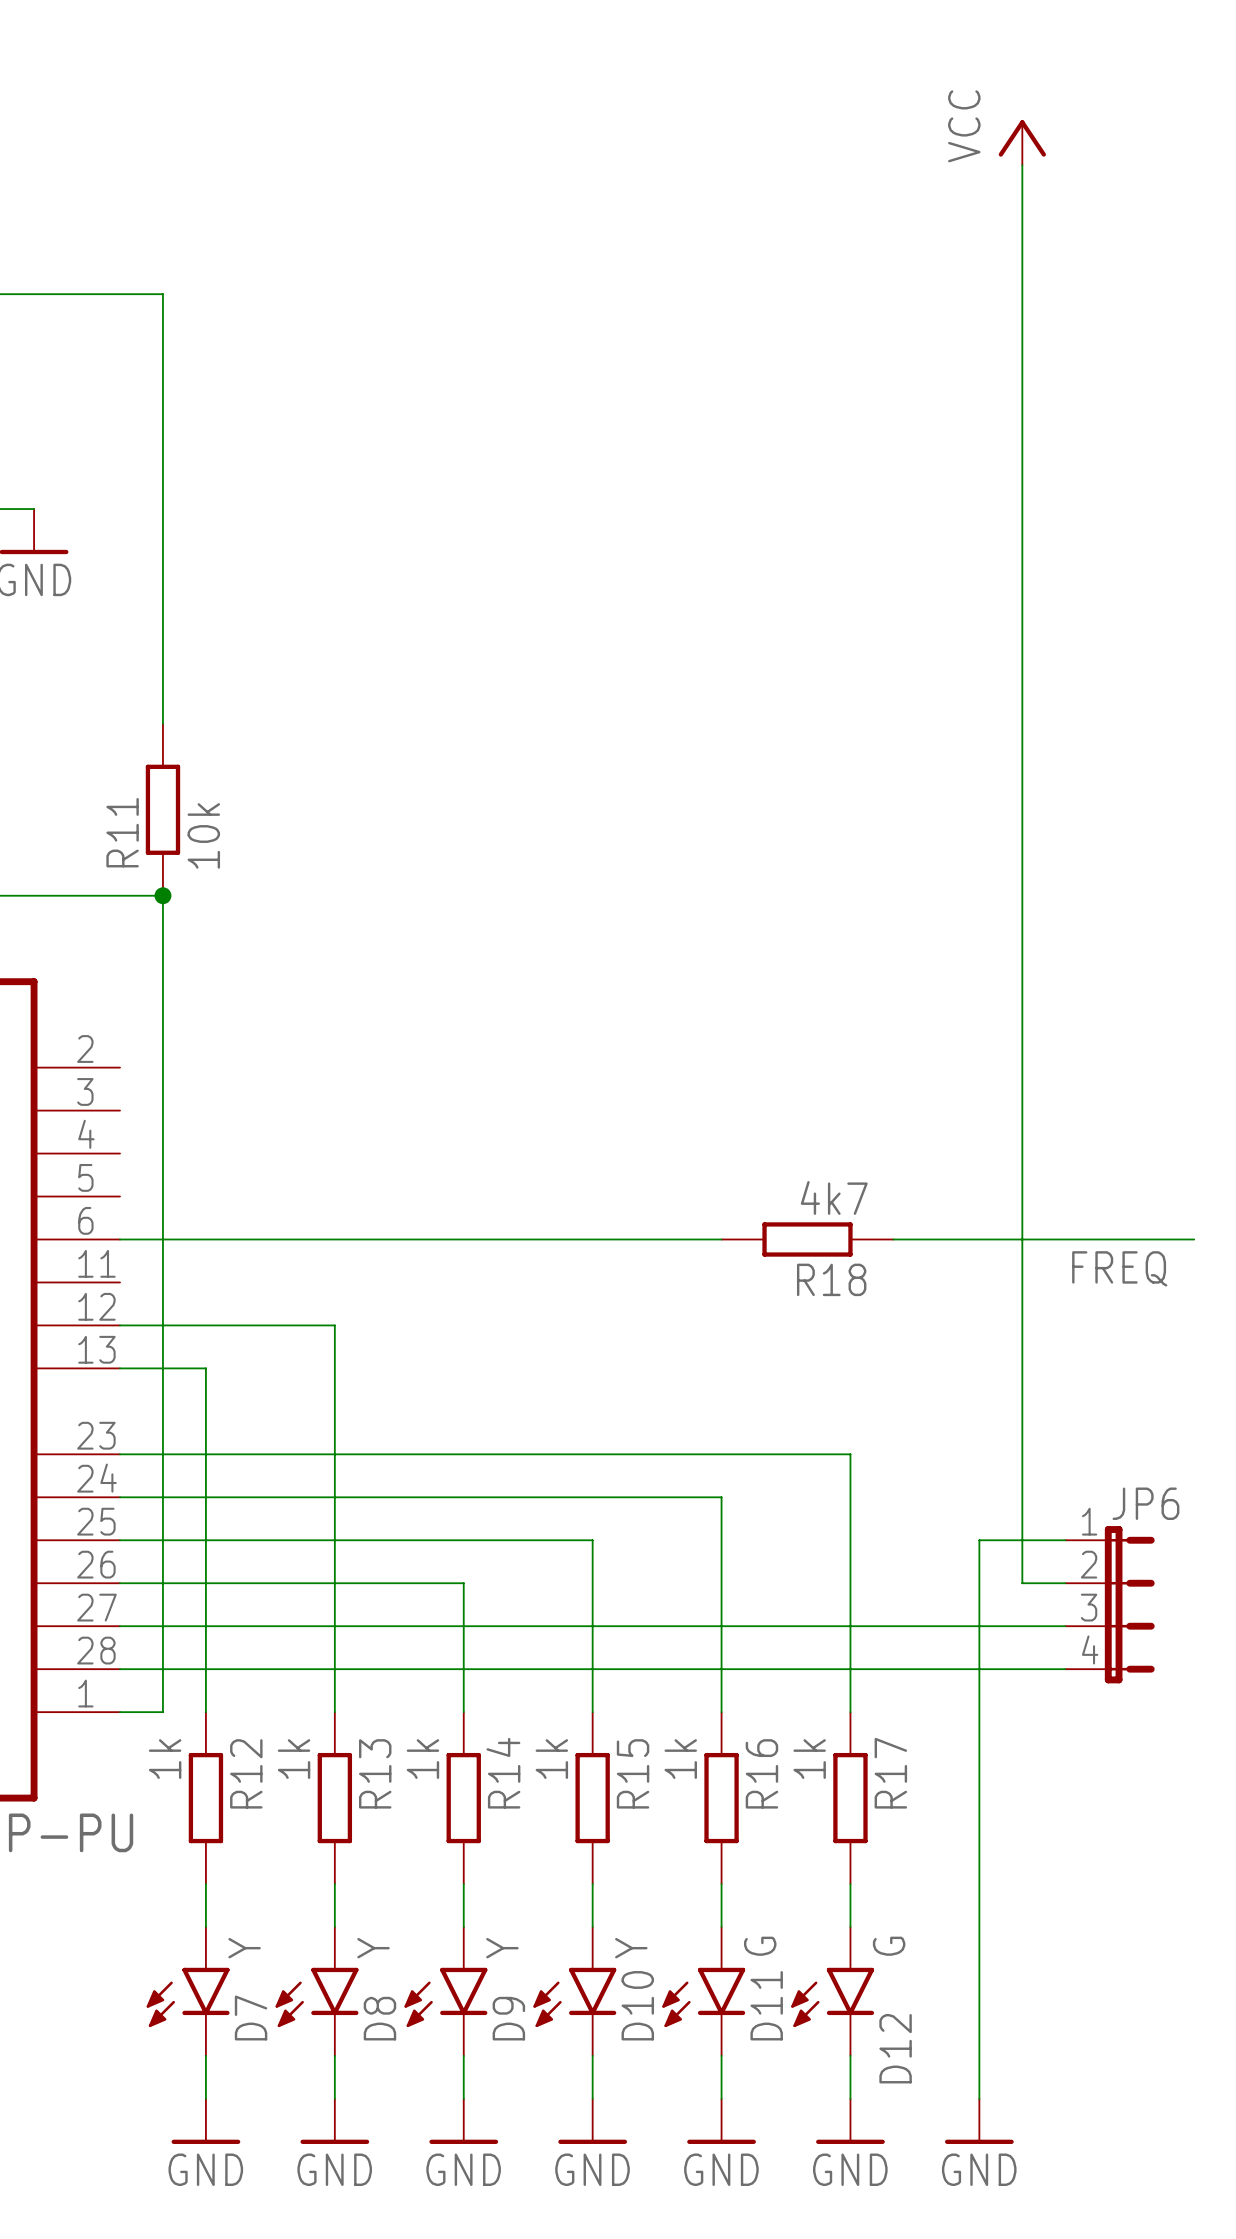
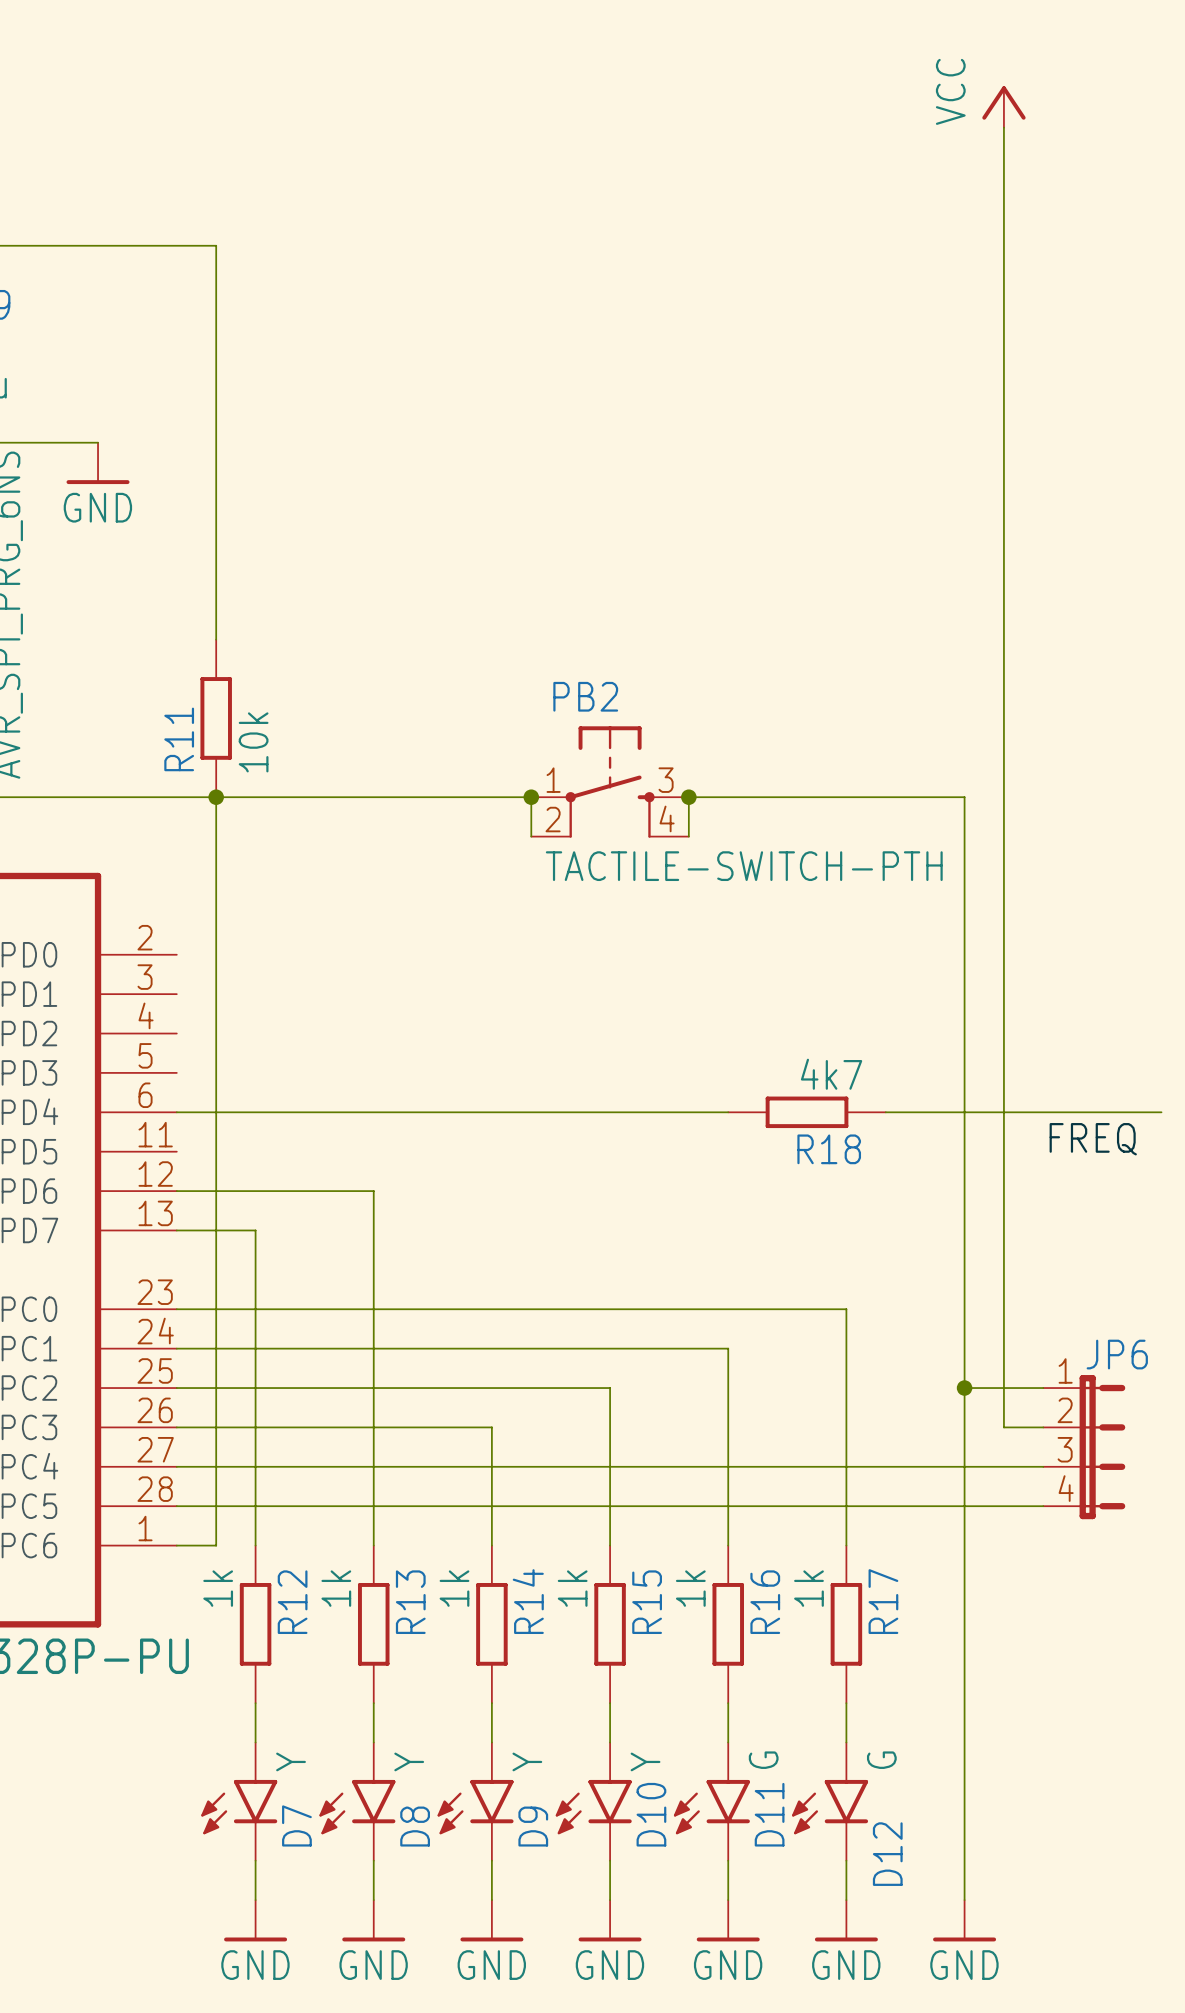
PB2: none -> TACTILE-SWITCH-PTH (610, 782)
wire: none -> (216, 797) (531, 797) (531, 836)
junction: none -> (531, 797)
junction: none -> (688, 797)
wire: none -> (688, 836) (688, 797) (964, 797) (964, 1388)
junction: none -> (964, 1388)

